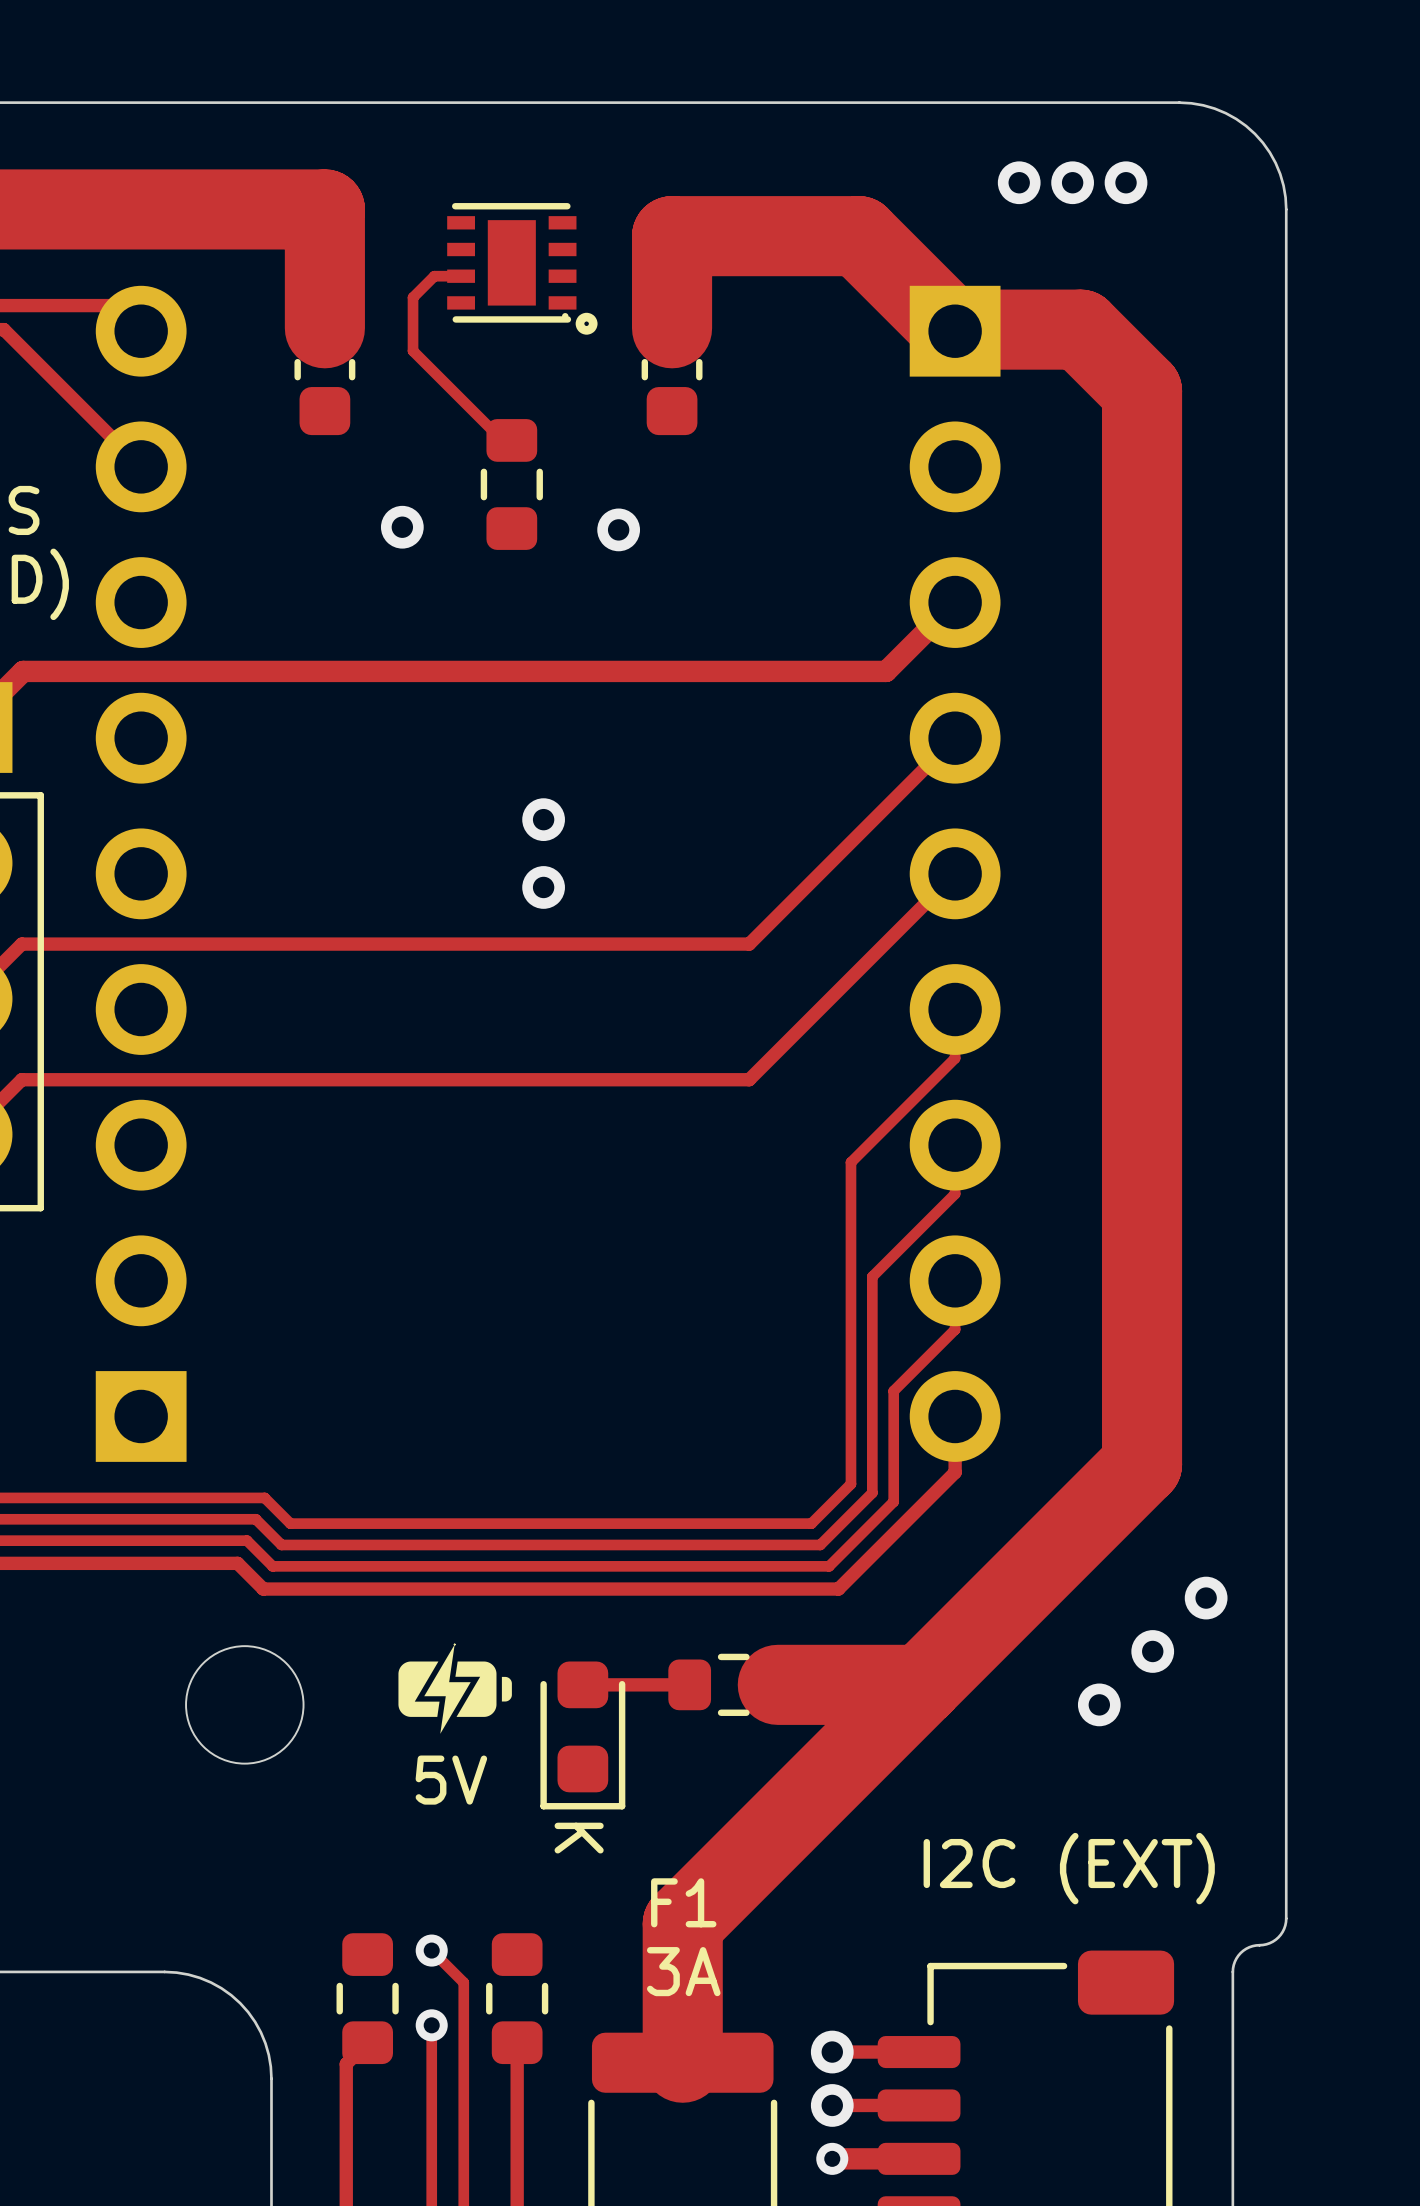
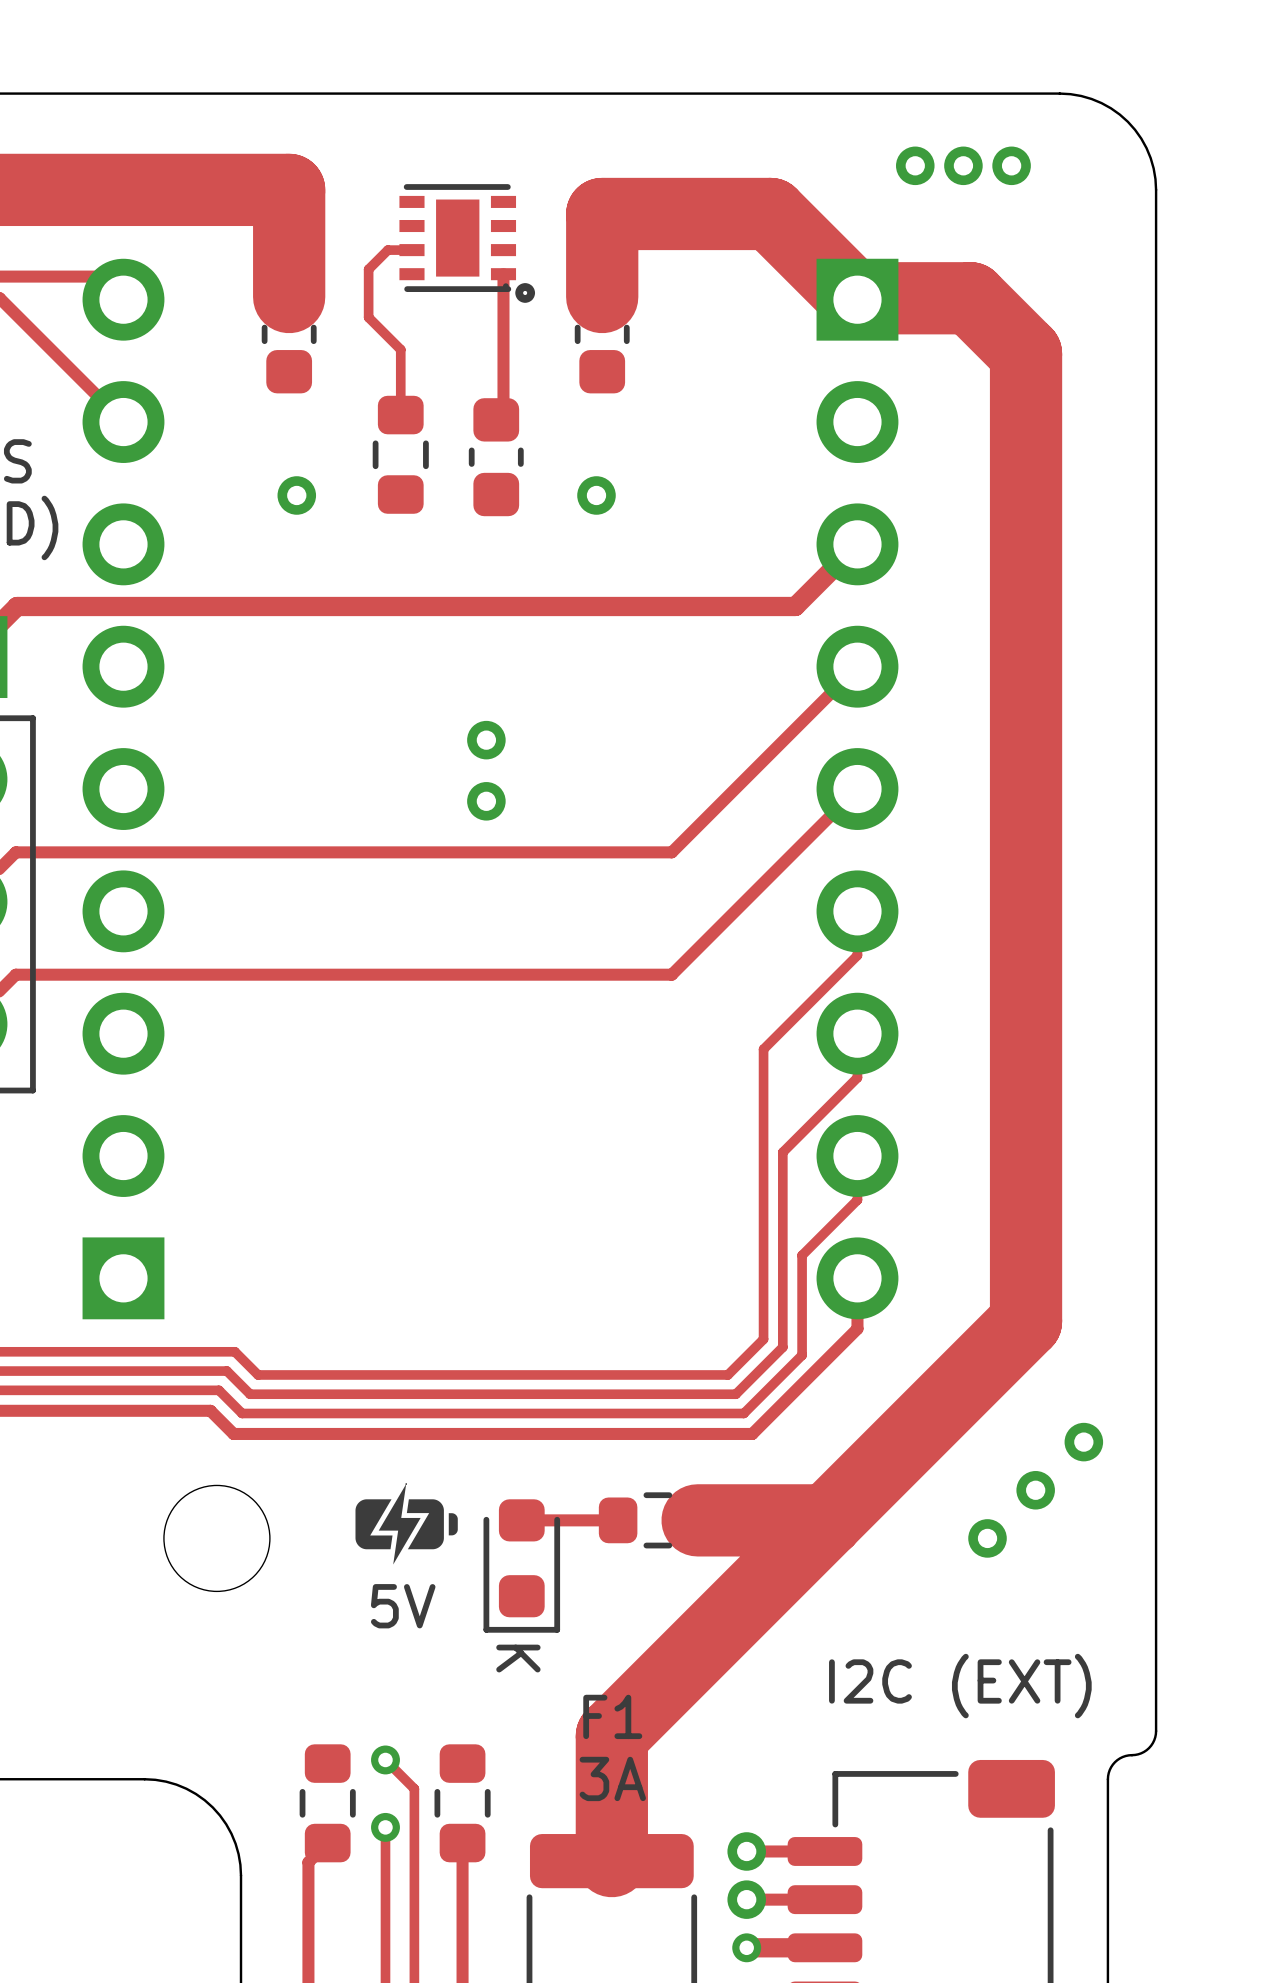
track: none -> (503, 274) (503, 412) (496, 419)
track: (448, 386) (502, 440) (511, 440) -> (400, 349) (400, 415)
part position: (511, 484) -> (400, 454)
part: none -> (496, 457)
via position: (402, 527) -> (296, 495)
via position: (618, 529) -> (596, 495)

